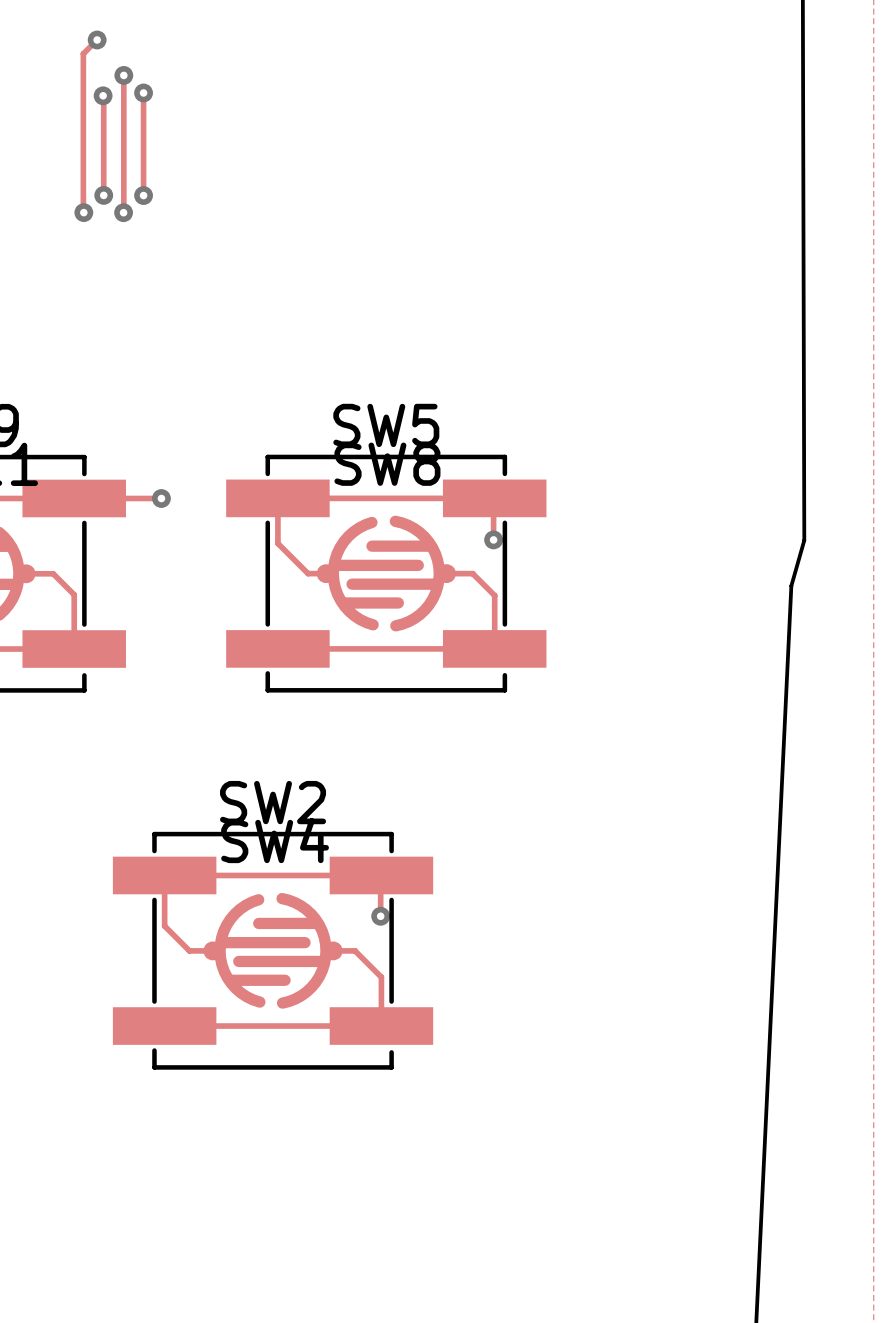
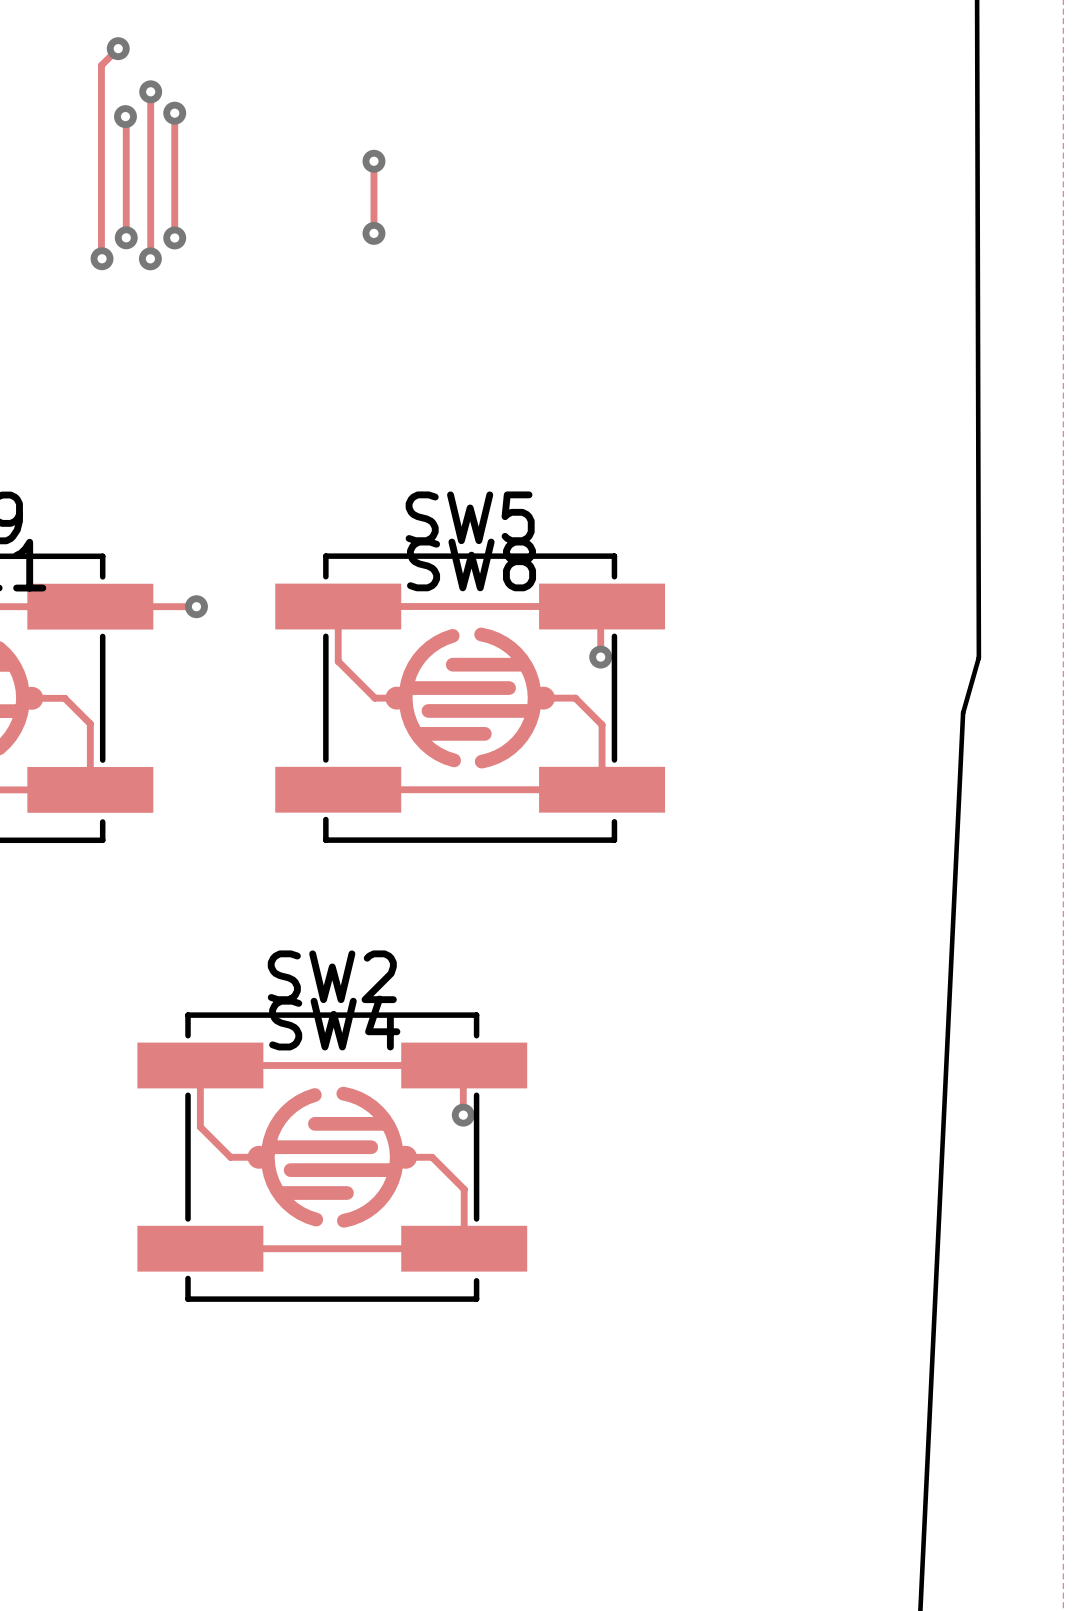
track: none -> (373, 161) (373, 233)
via: none -> (373, 161)
via: none -> (373, 233)

